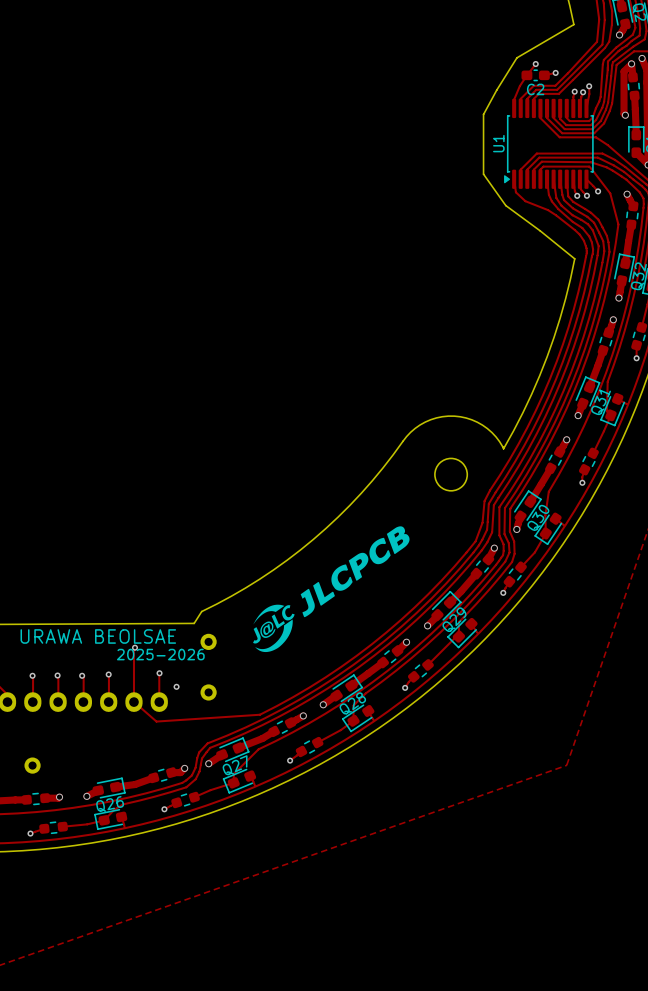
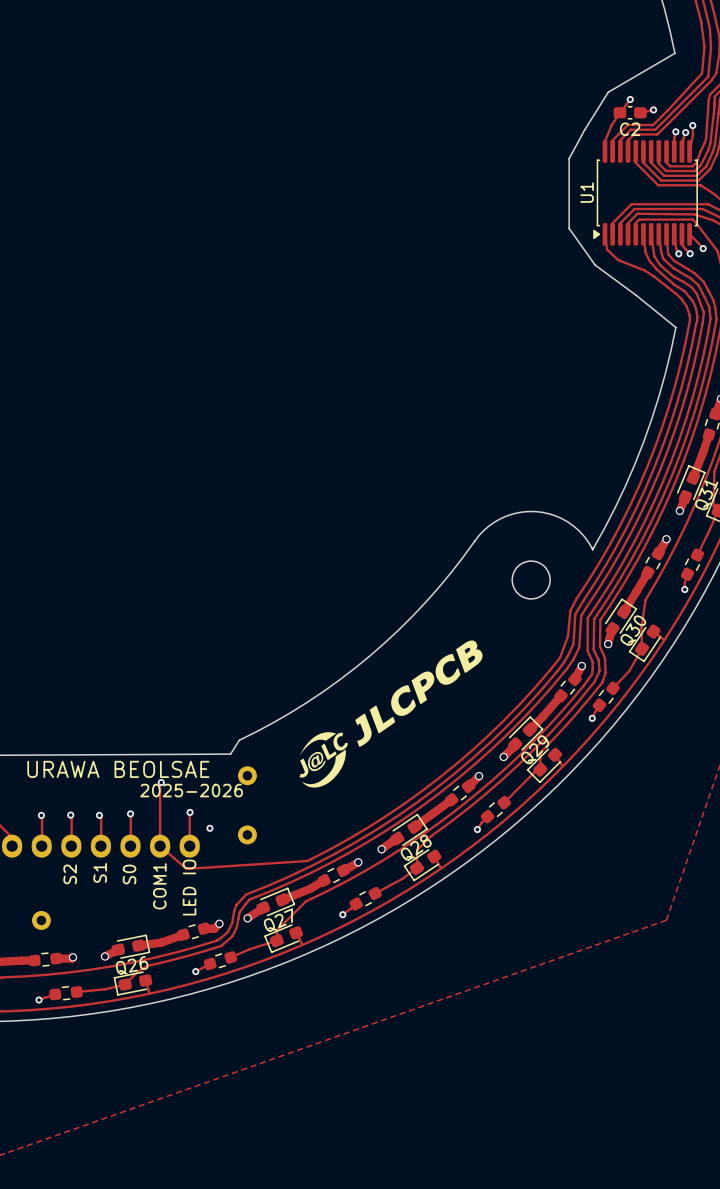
text: none -> S1 (100, 872)
text: none -> S2 (70, 874)
text: none -> S0 (129, 874)
text: none -> COM1 (159, 886)
text: none -> LED IO (189, 887)

